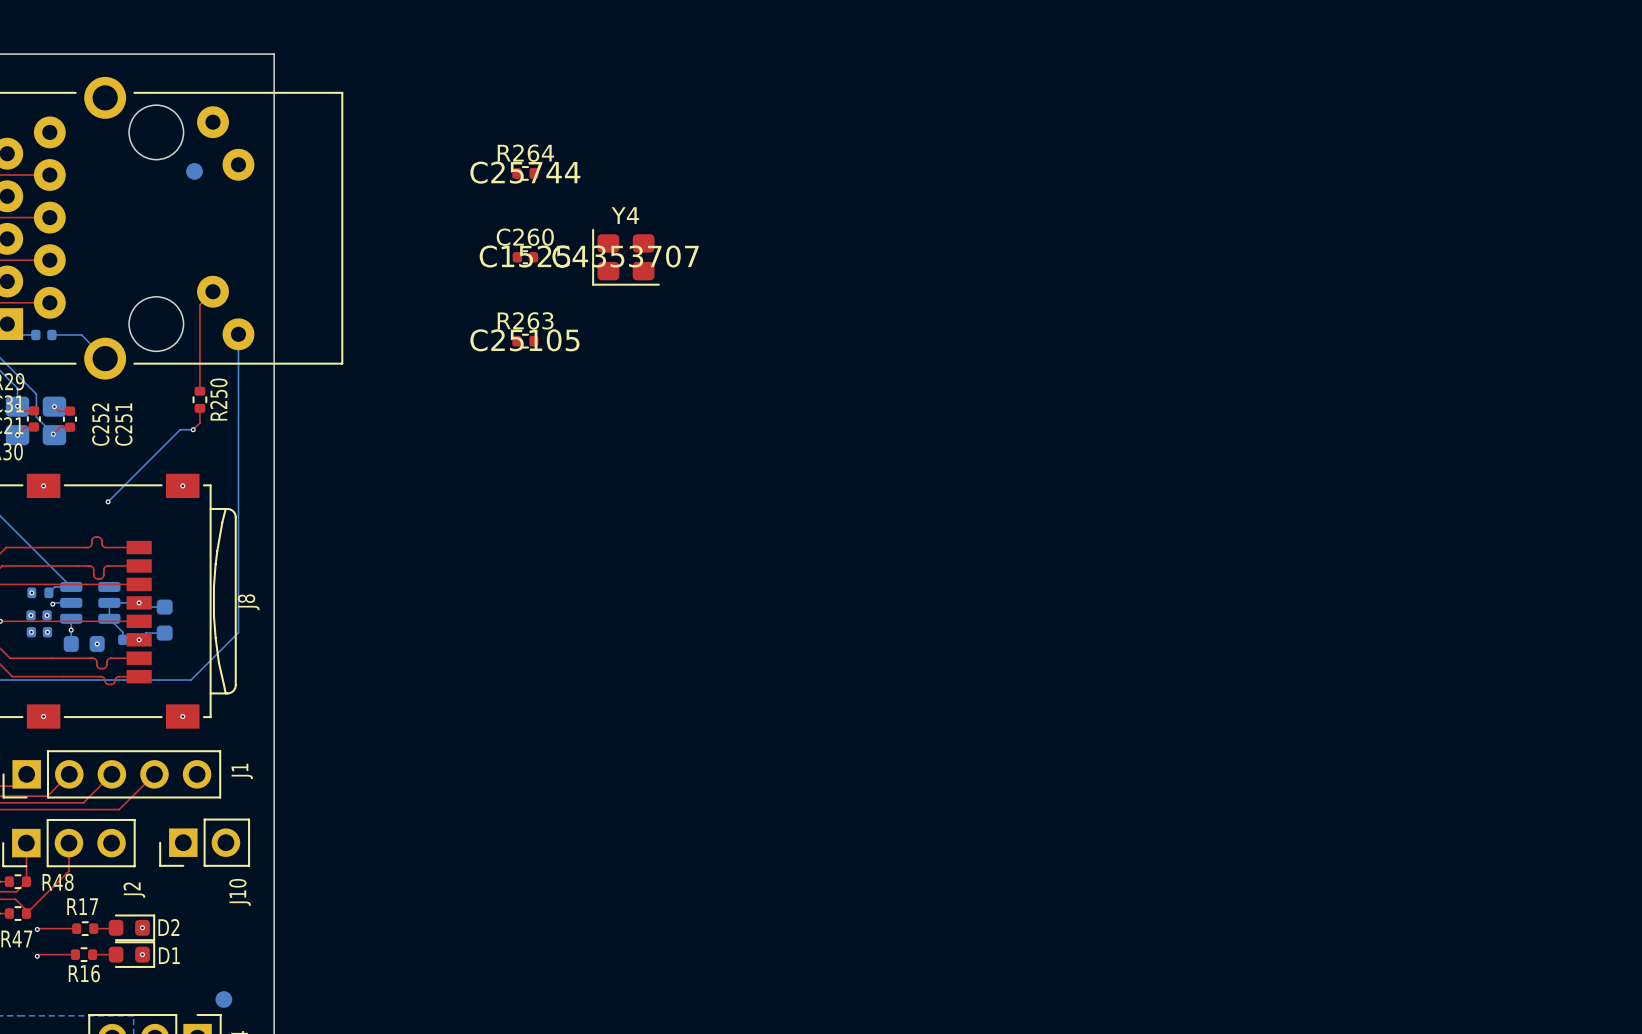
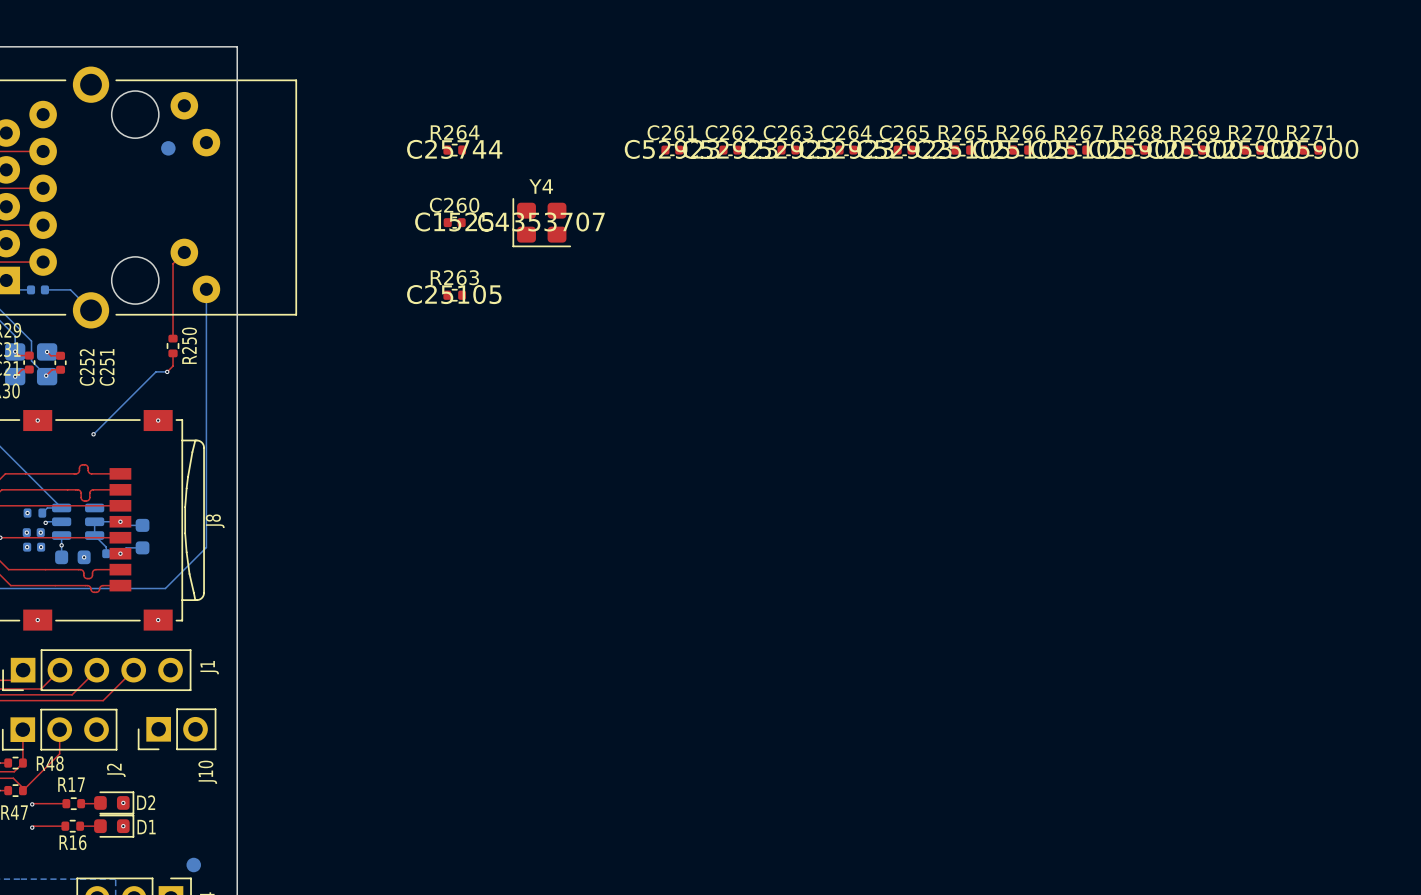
C261: none -> (672, 150)
C262: none -> (730, 150)
C263: none -> (788, 150)
C264: none -> (846, 150)
C265: none -> (904, 150)
R265: none -> (962, 150)
R266: none -> (1020, 150)
R267: none -> (1078, 150)
R268: none -> (1136, 150)
R269: none -> (1194, 150)
R270: none -> (1252, 150)
R271: none -> (1310, 150)

